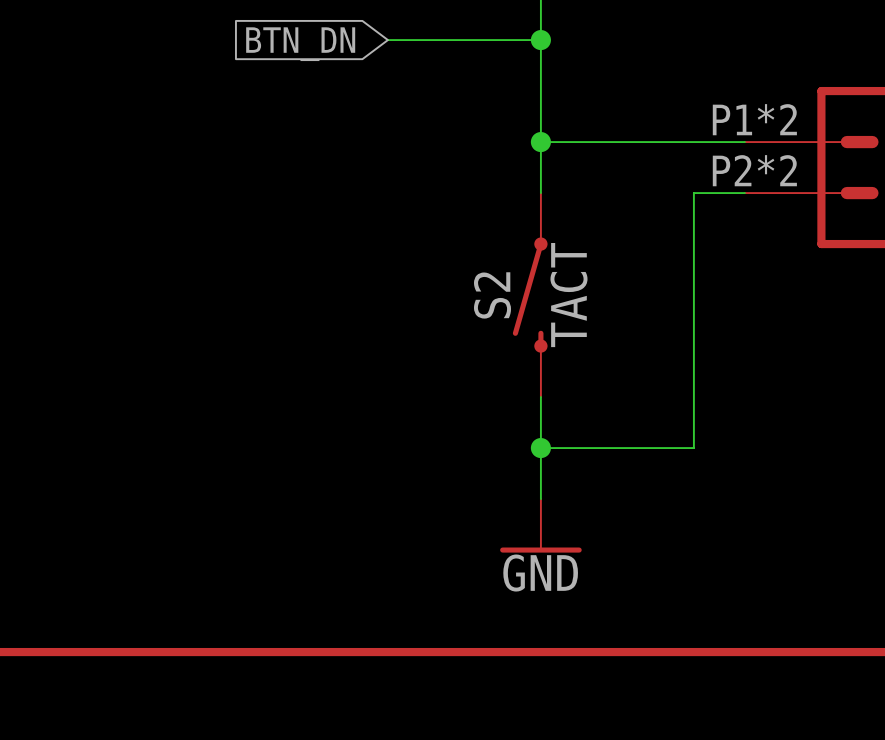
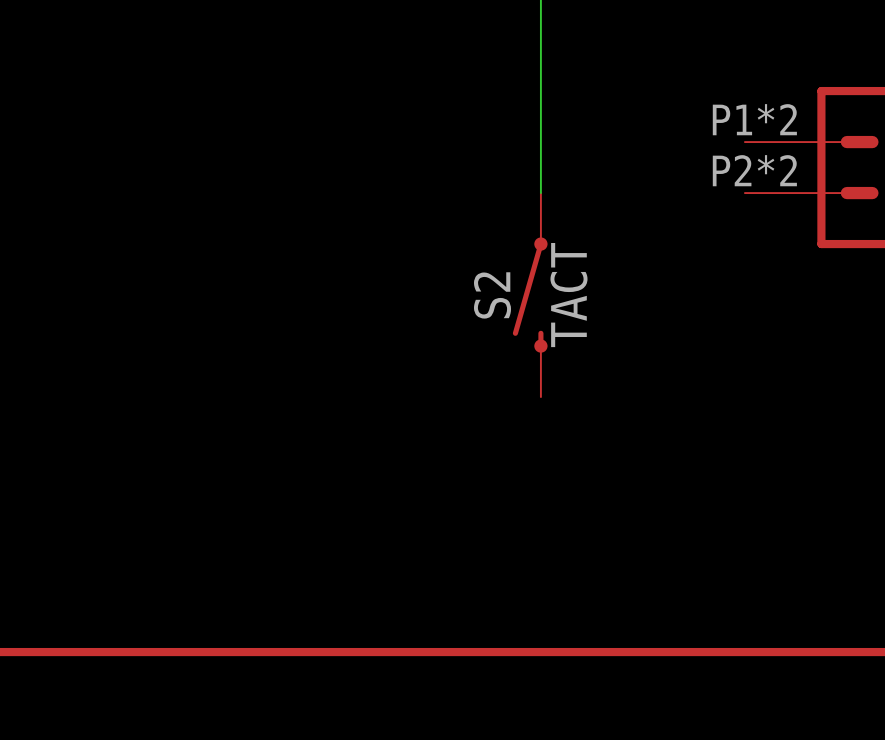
wire: (387, 40) (540, 40) -> none
junction: (540, 40) -> none
global label: BTN_DN (300, 44) -> none
wire: (540, 142) (744, 142) -> none
junction: (540, 142) -> none
wire: (744, 193) (693, 193) (693, 448) (540, 448) -> none
wire: (540, 397) (540, 499) -> none
junction: (540, 448) -> none
power symbol: GND (540, 525) -> none

